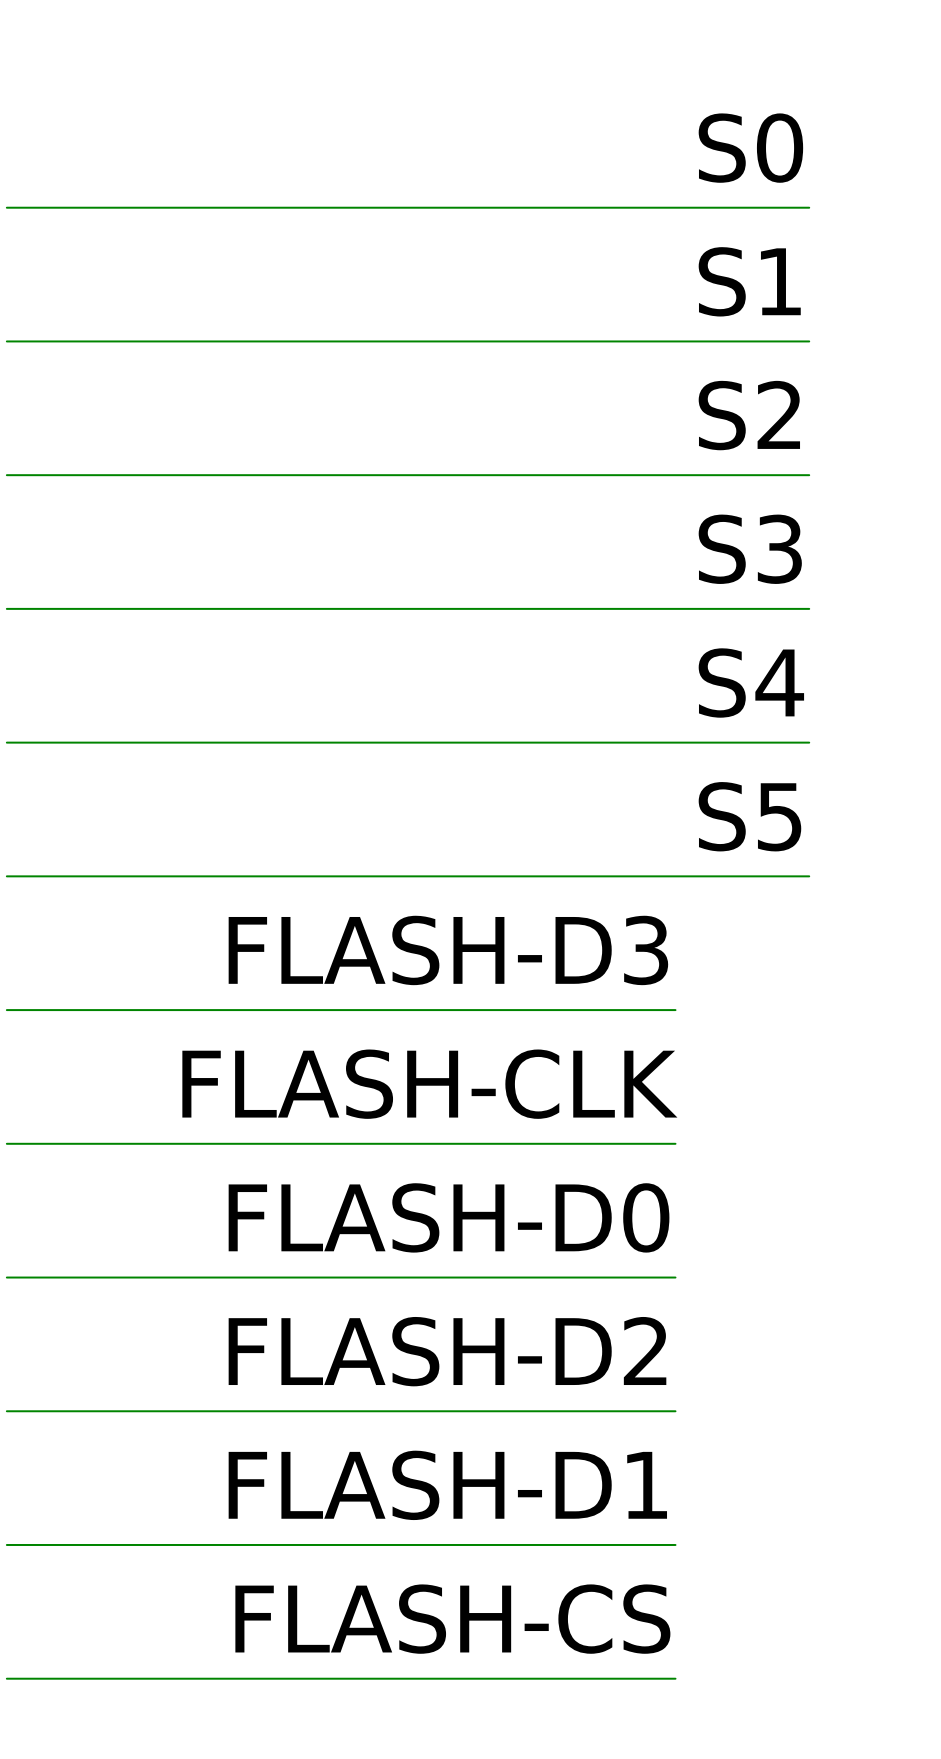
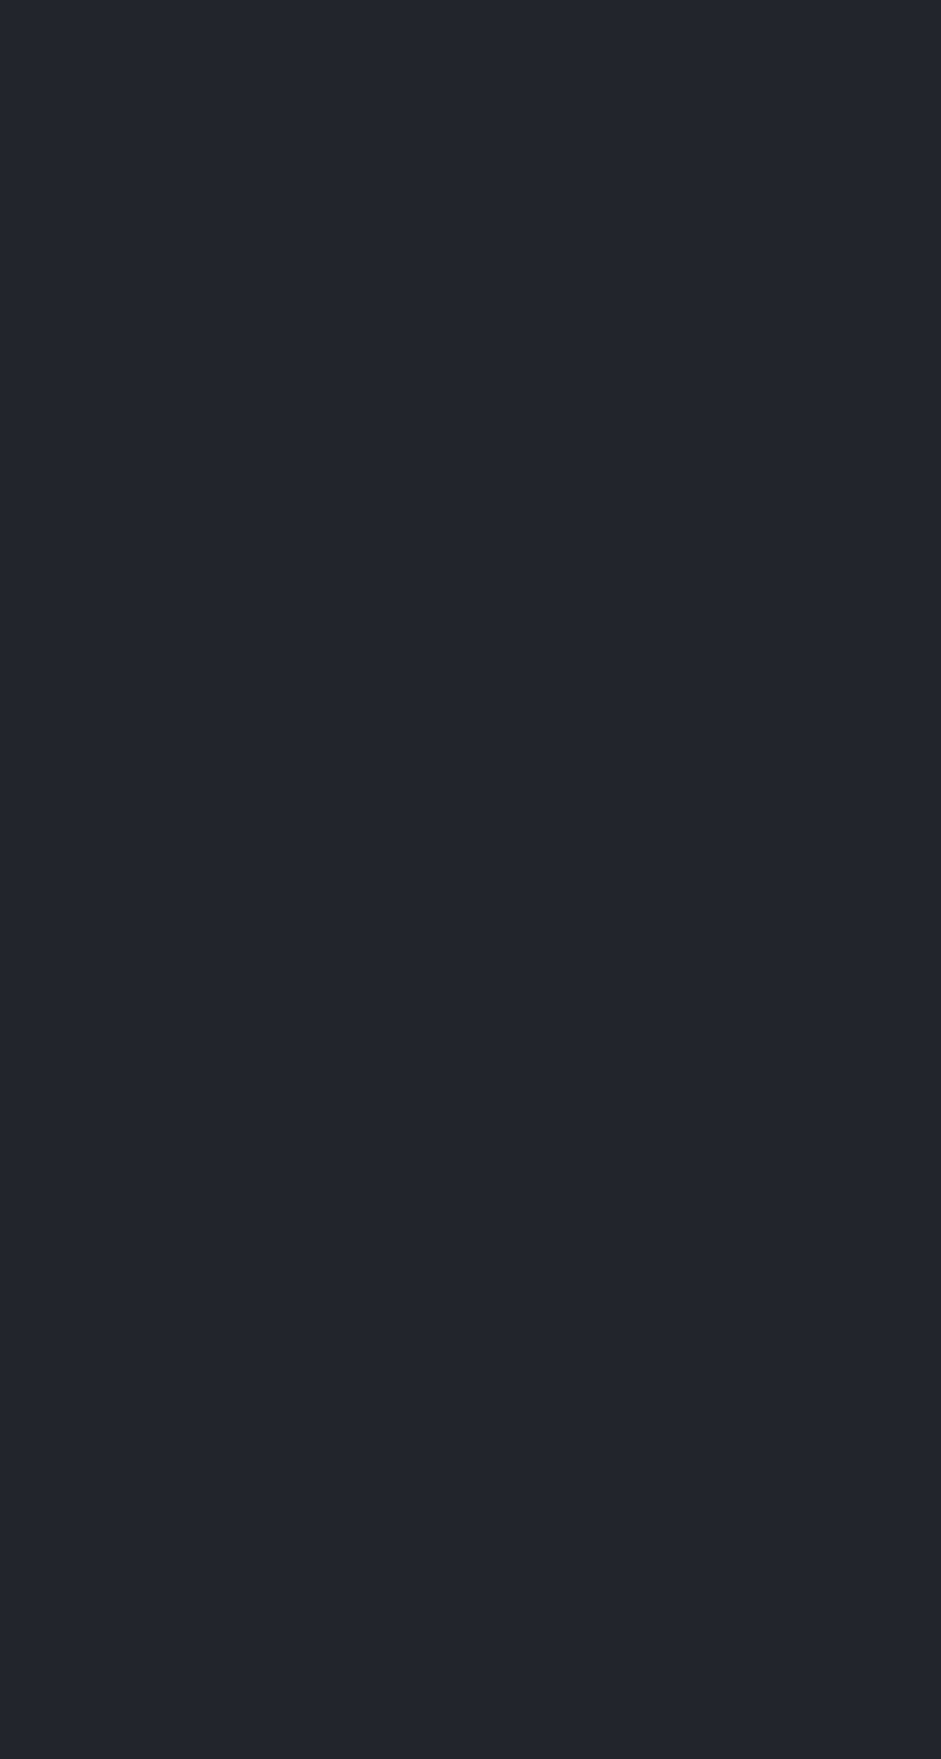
label: S0 (750, 148) -> none
wire: (6, 207) (809, 207) -> none
label: S1 (749, 281) -> none
wire: (6, 341) (809, 341) -> none
label: S2 (749, 415) -> none
wire: (6, 475) (809, 475) -> none
label: S3 (750, 549) -> none
wire: (6, 608) (809, 608) -> none
label: S4 (751, 683) -> none
wire: (6, 742) (809, 742) -> none
label: S5 (749, 816) -> none
wire: (6, 876) (809, 876) -> none
label: FLASH-D3 (448, 950) -> none
wire: (6, 1010) (675, 1010) -> none
label: FLASH-CLK (429, 1084) -> none
wire: (6, 1143) (675, 1143) -> none
label: FLASH-D0 (449, 1217) -> none
wire: (6, 1277) (675, 1277) -> none
label: FLASH-D2 (447, 1351) -> none
wire: (6, 1411) (675, 1411) -> none
label: FLASH-D1 (447, 1485) -> none
wire: (6, 1544) (675, 1544) -> none
label: FLASH-CS (452, 1619) -> none
wire: (6, 1678) (675, 1678) -> none

